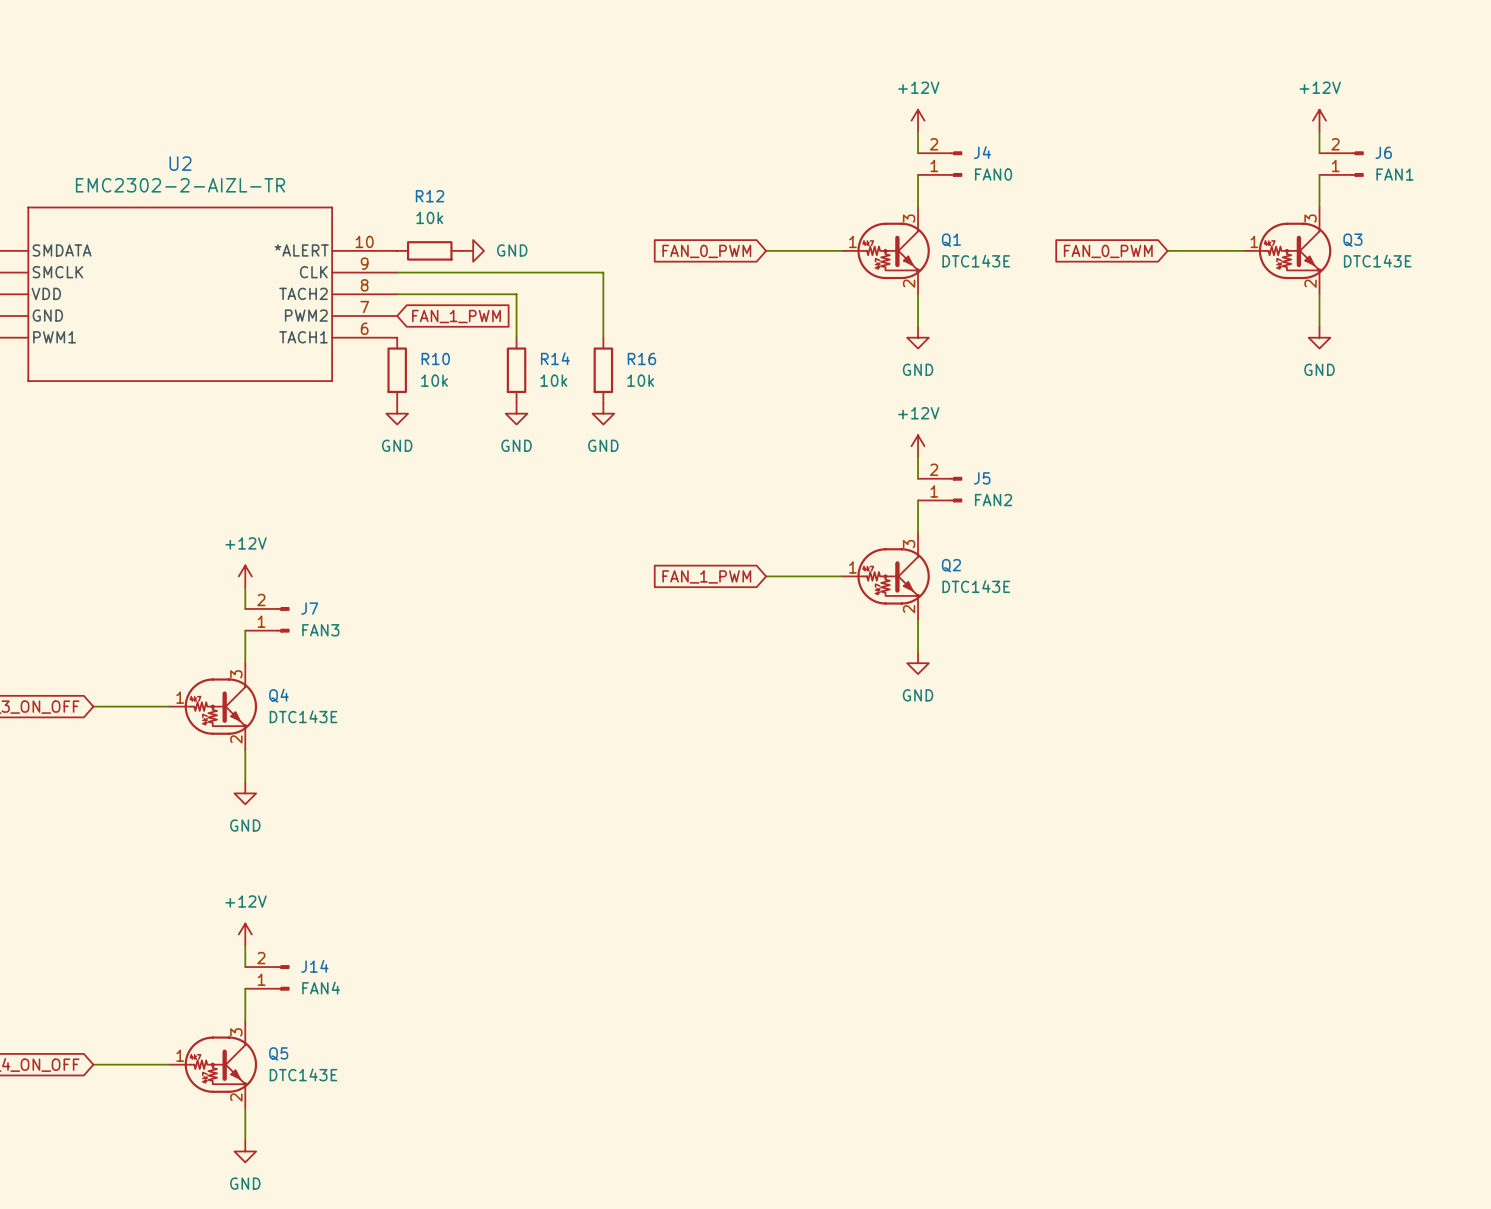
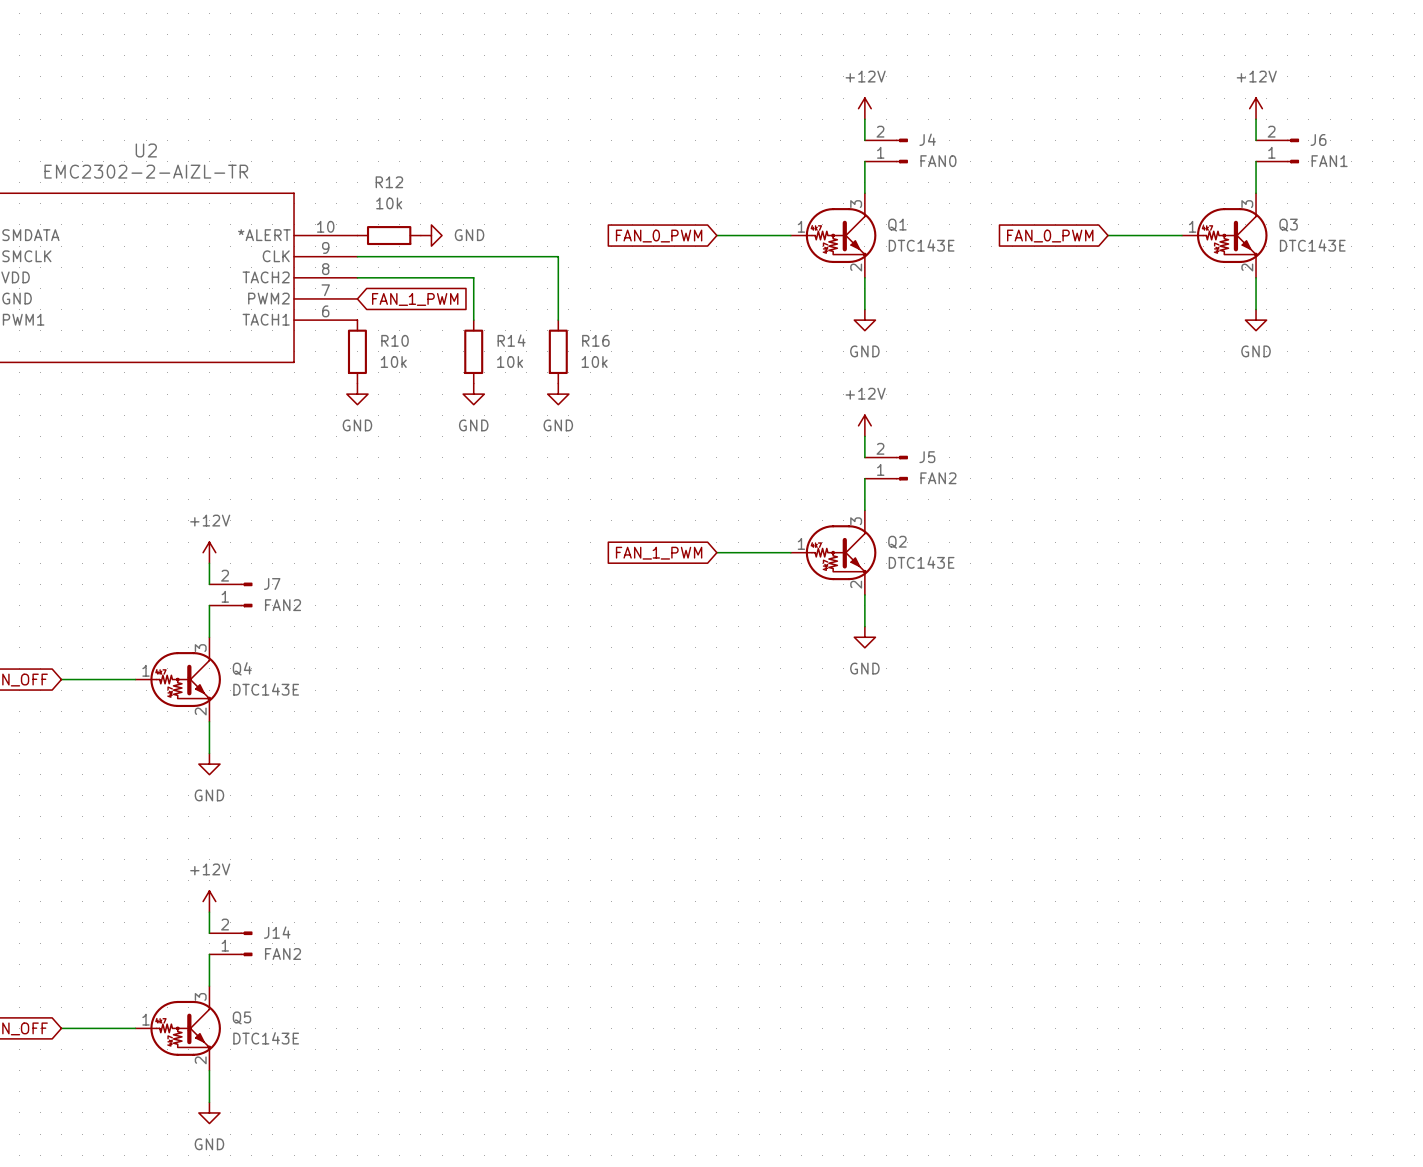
J7 value: FAN3 (320, 630) -> FAN2 (283, 605)
J14 value: FAN4 (321, 988) -> FAN2 (283, 954)

